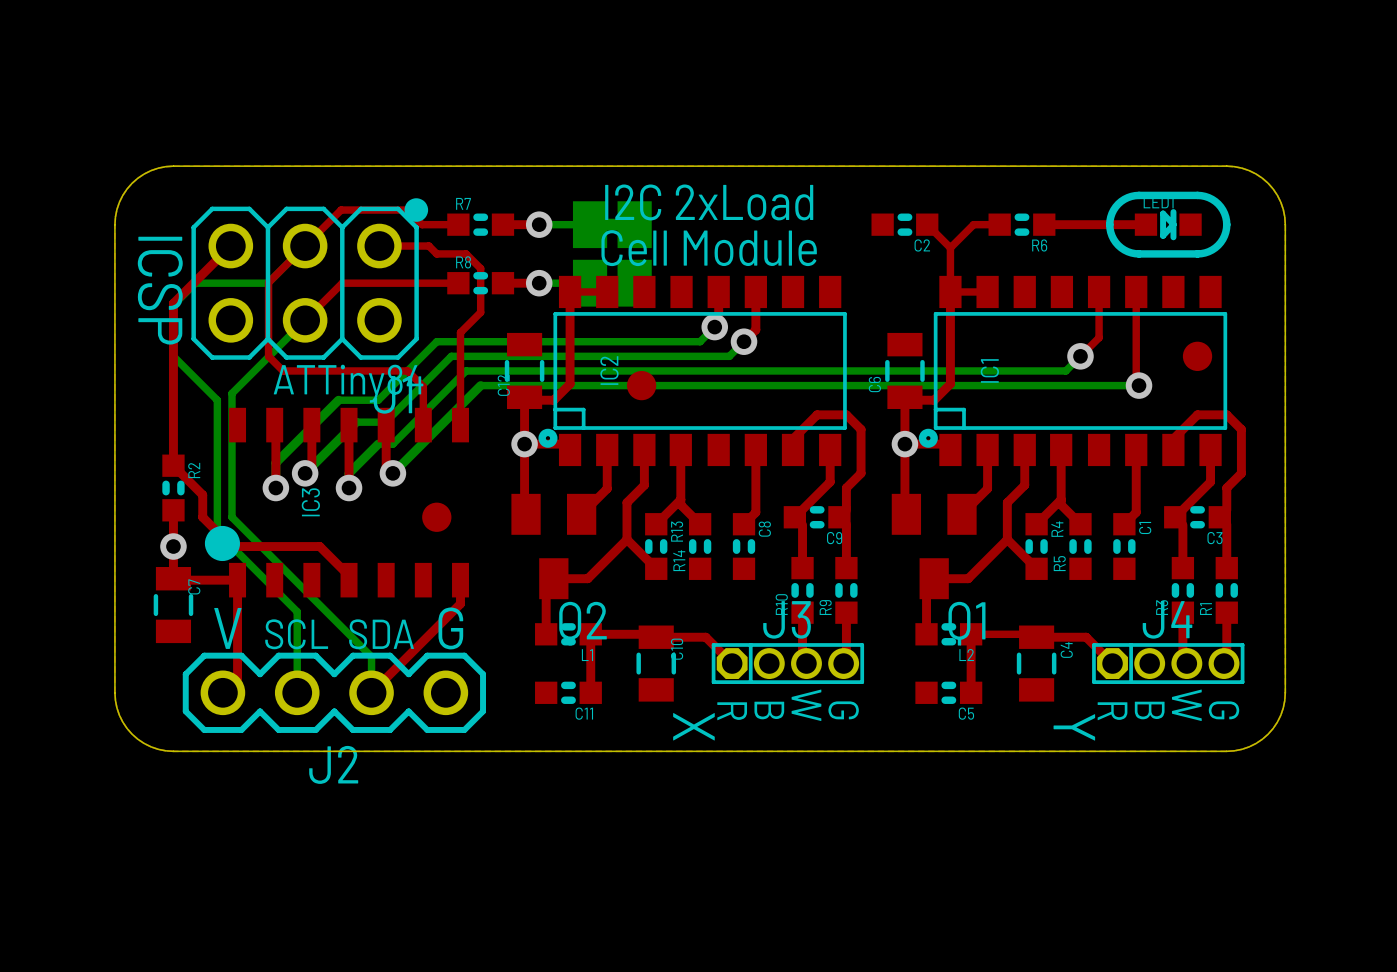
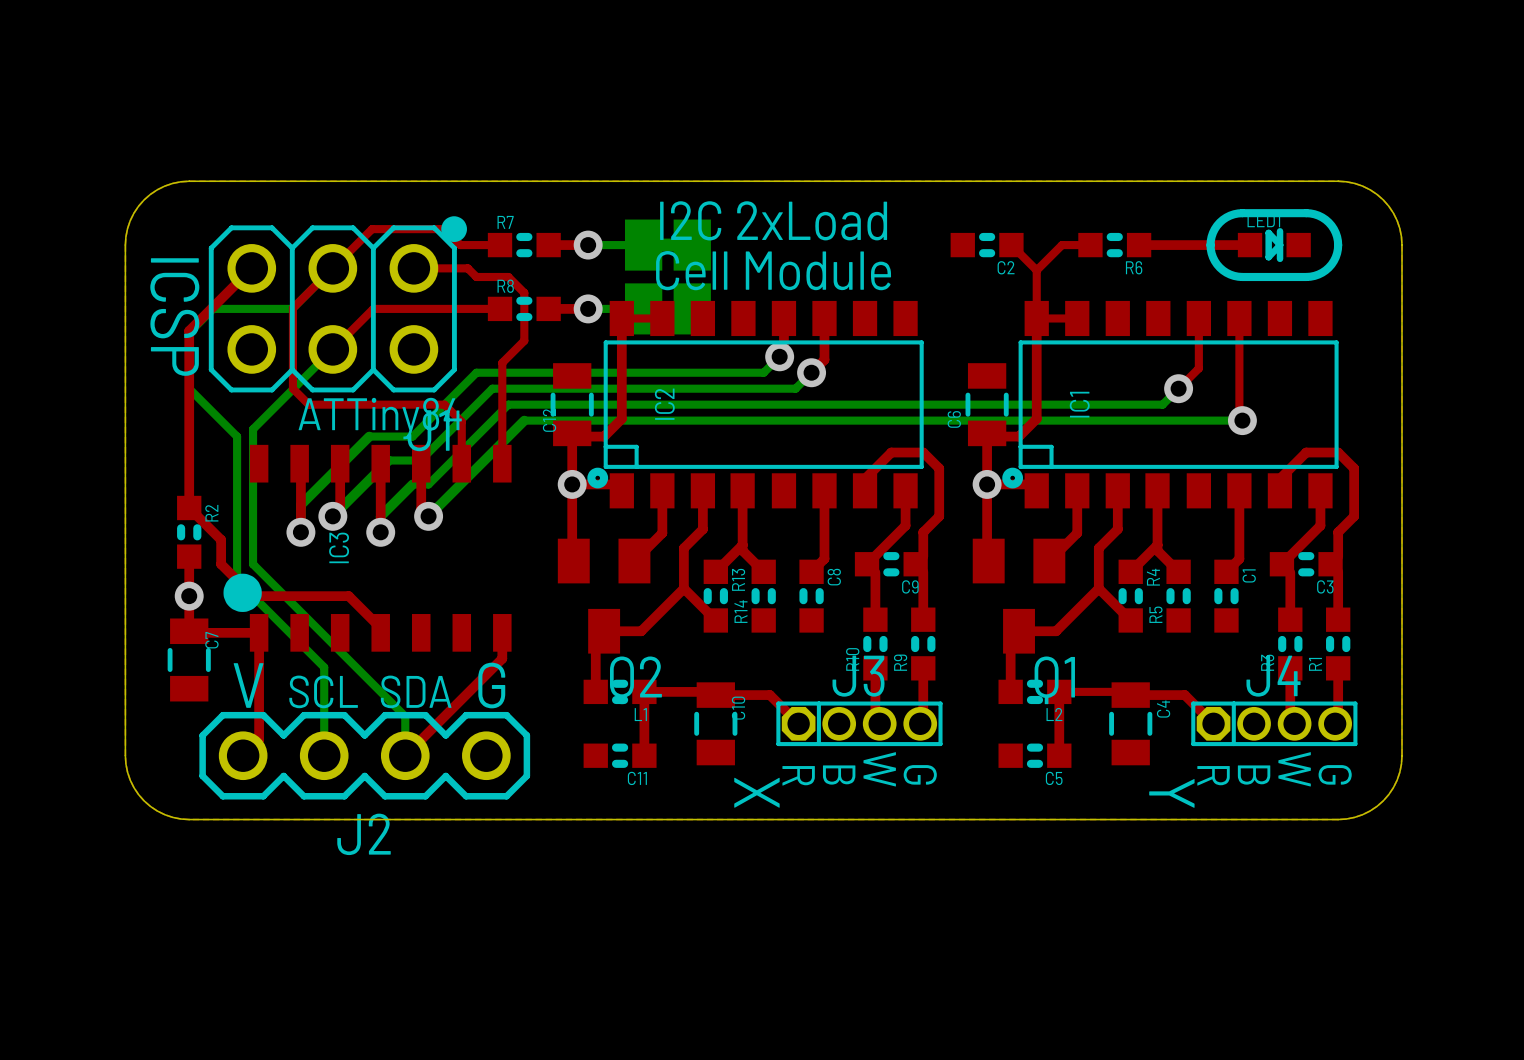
part: (1197, 356) -> none
part: (641, 385) -> none
part: (436, 517) -> none

